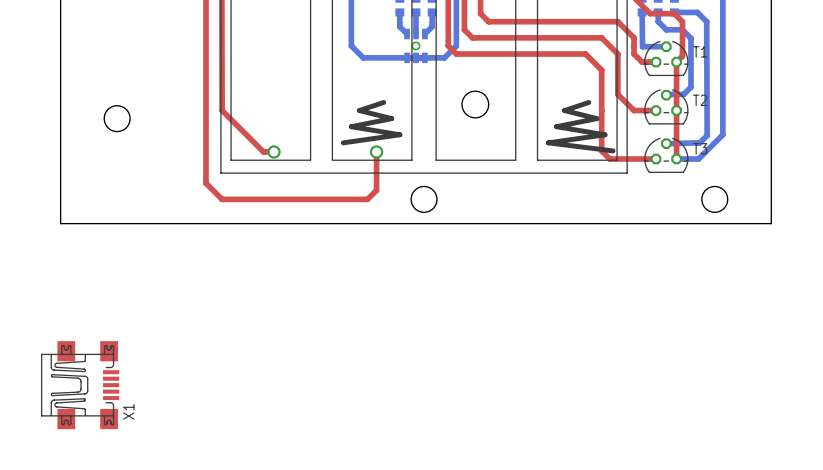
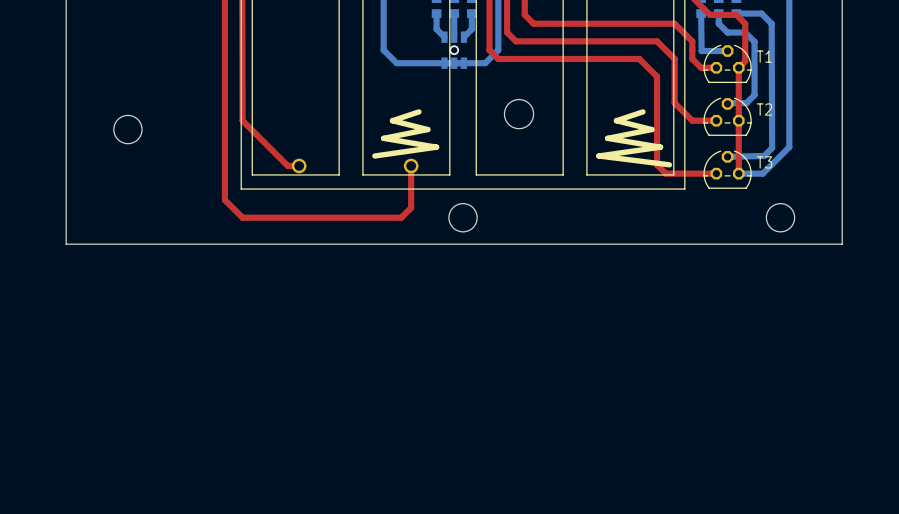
X1: (80, 385) -> none

